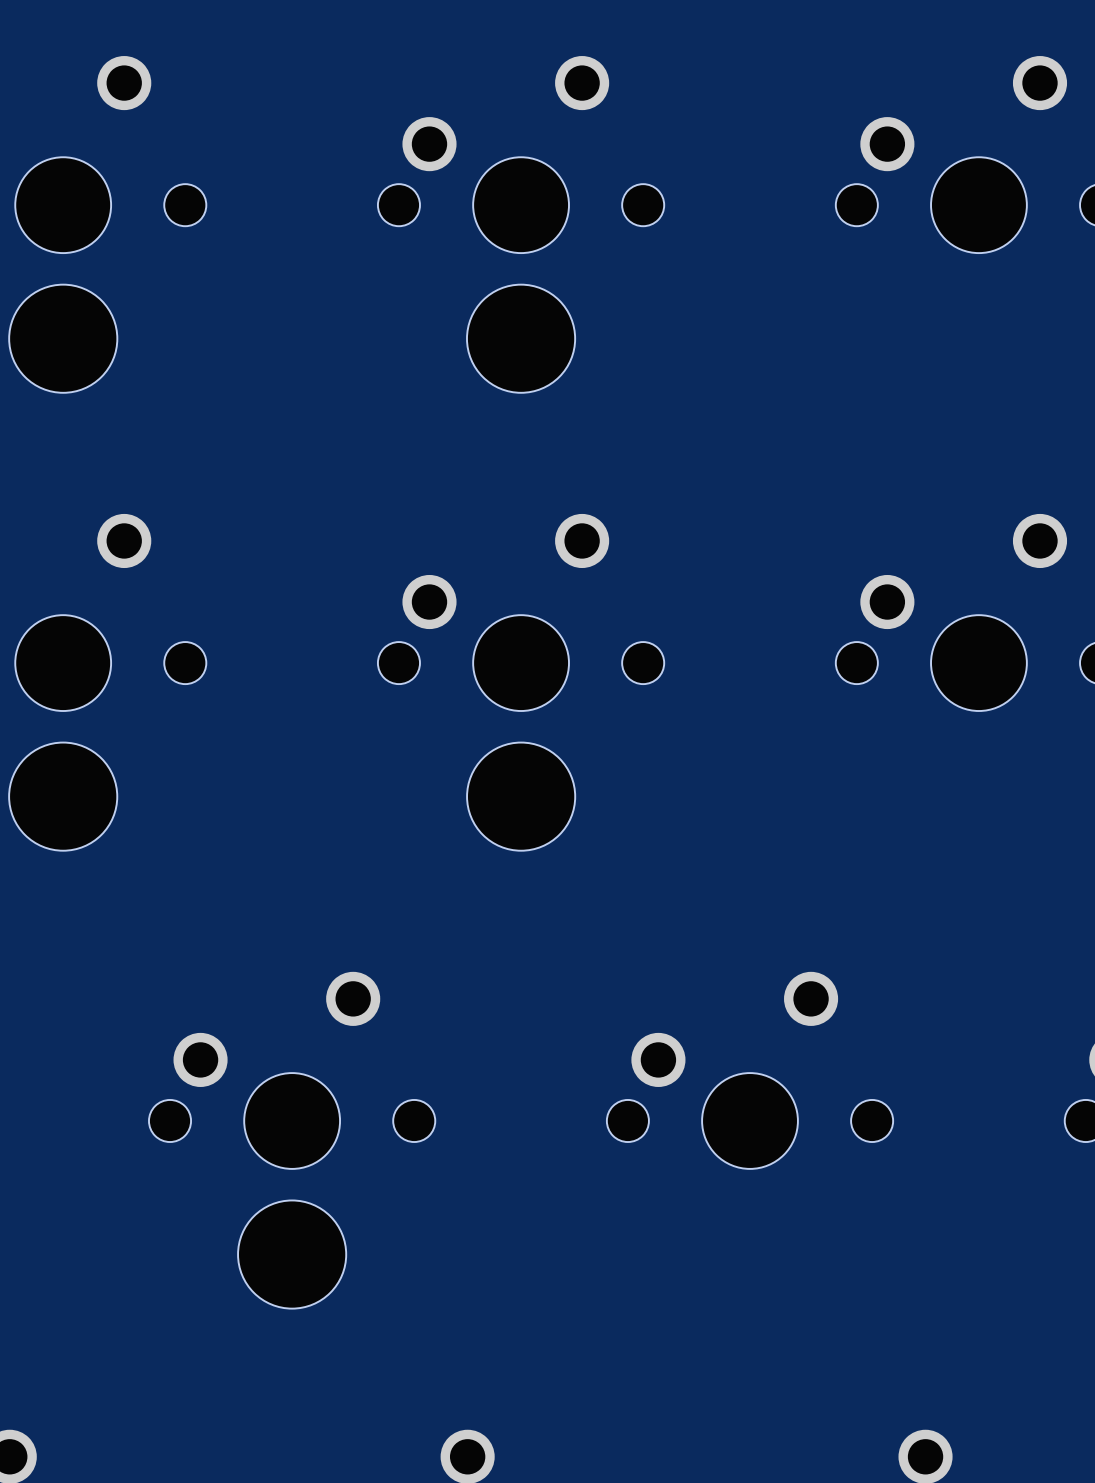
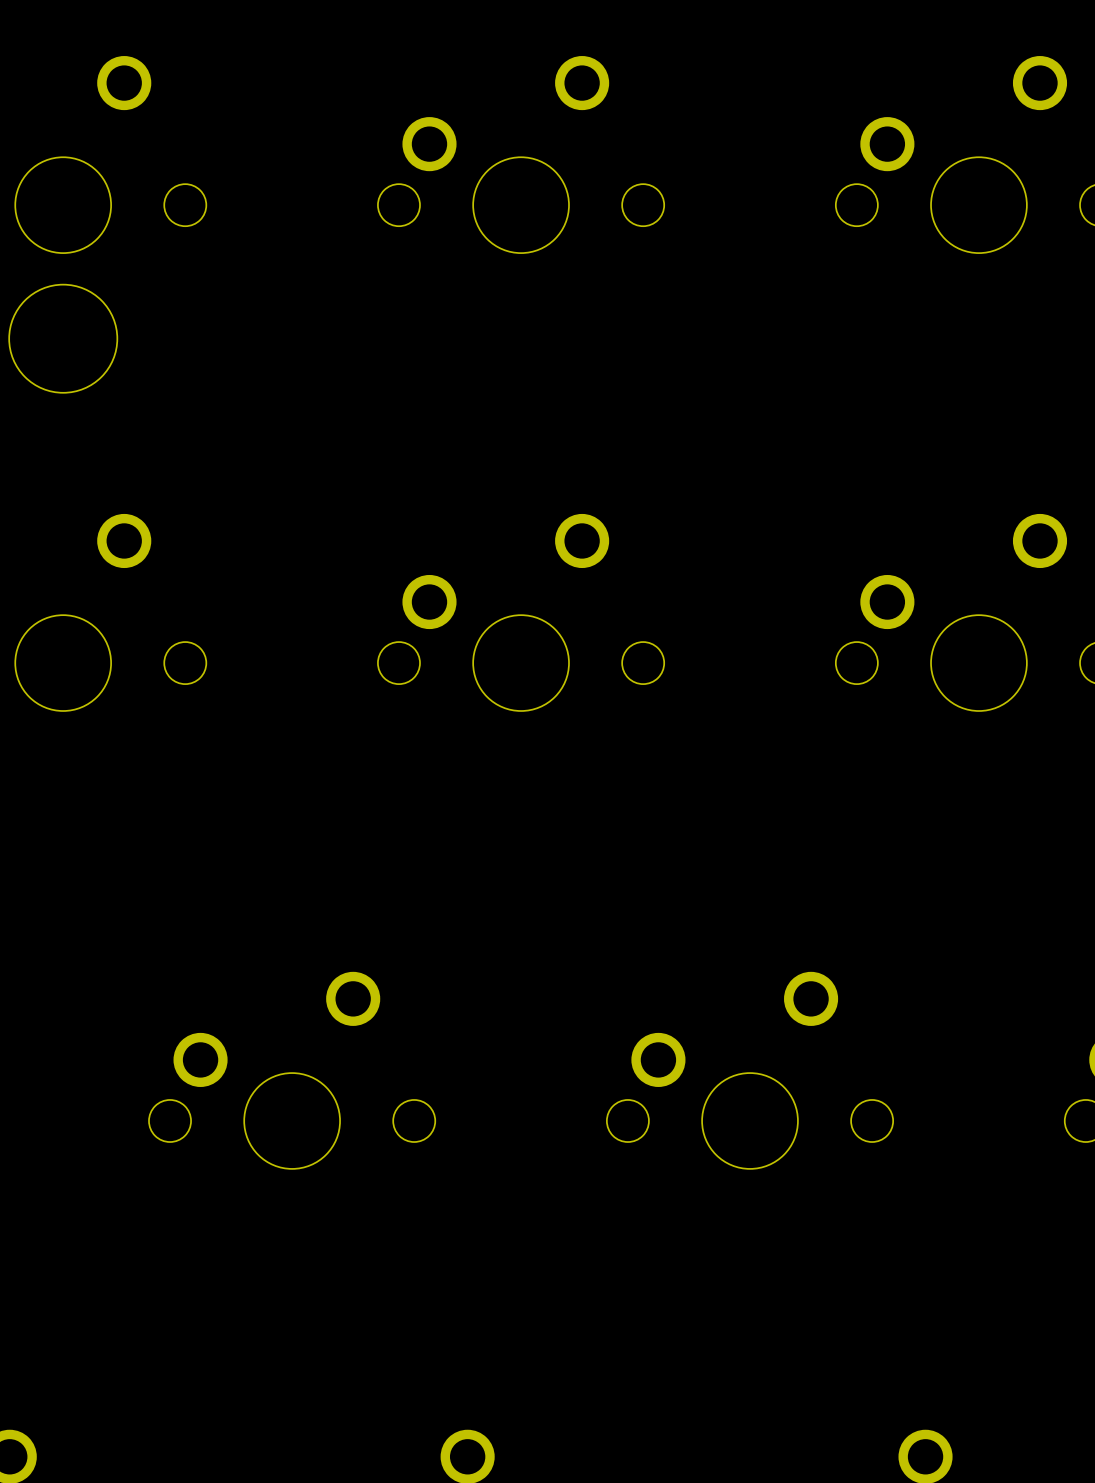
part: (521, 338) -> none
part: (63, 796) -> none
part: (521, 796) -> none
part: (292, 1254) -> none

